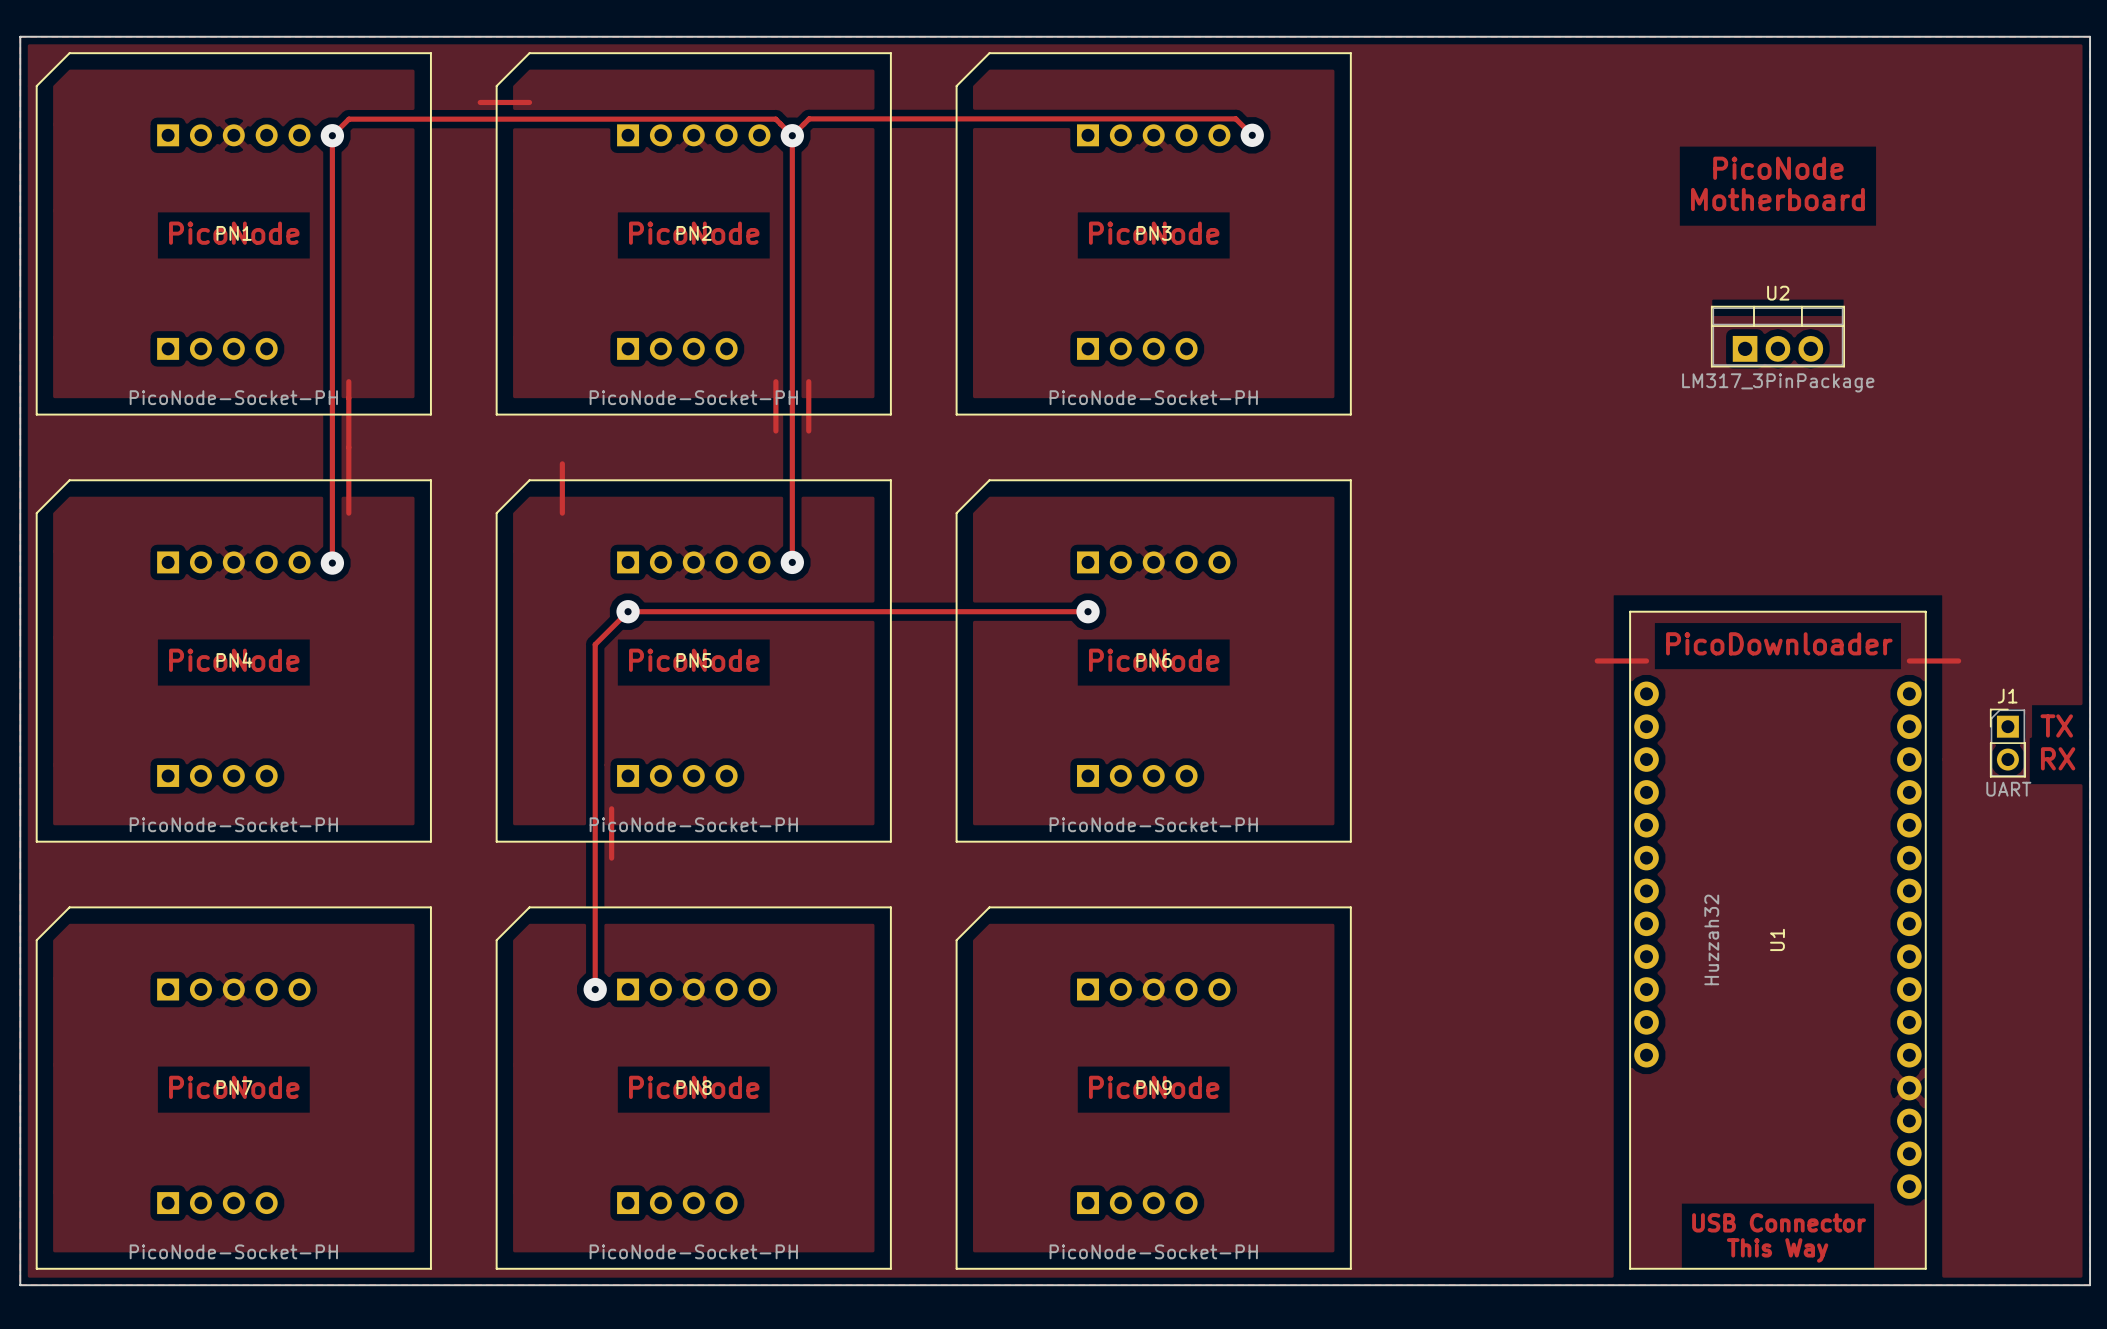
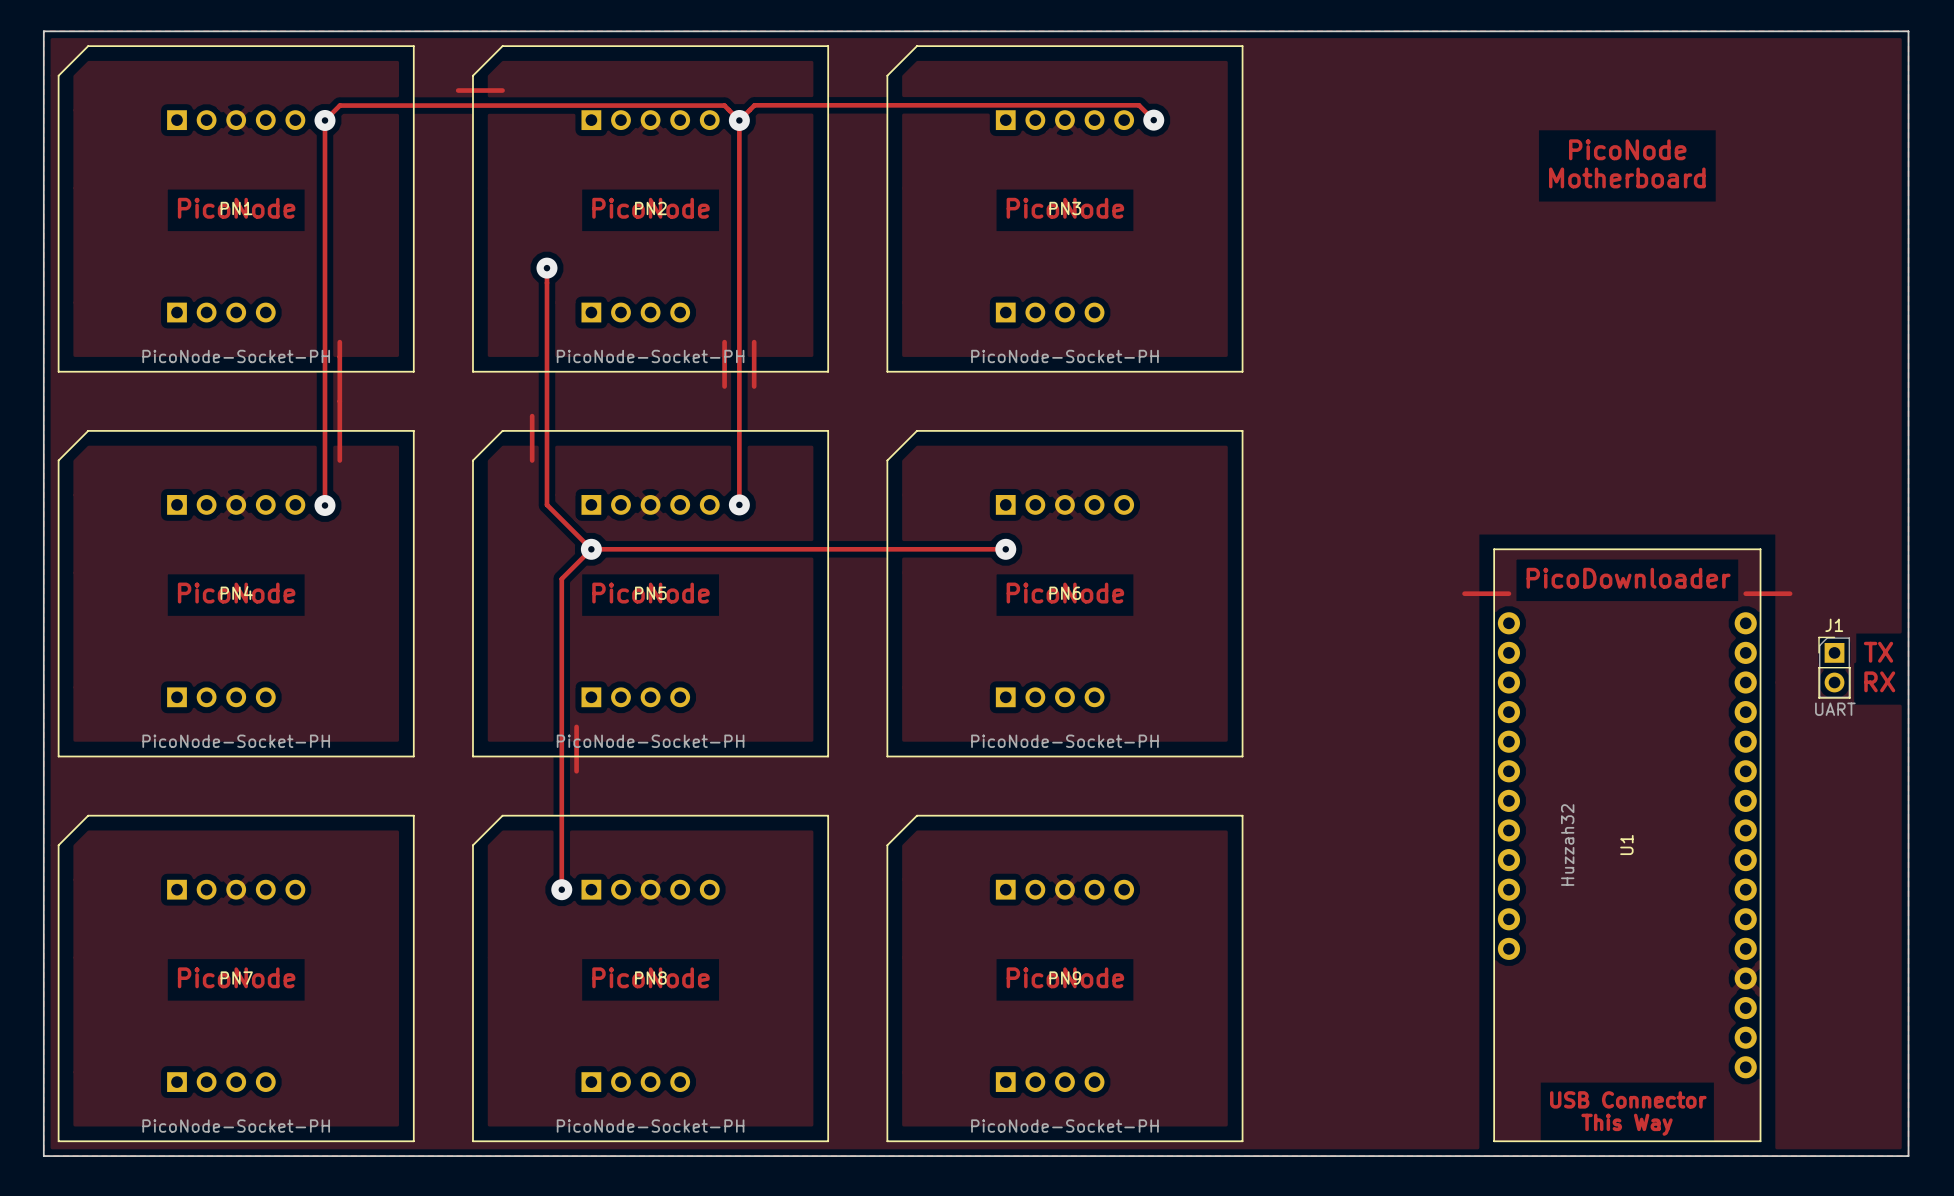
track: none -> (546, 268) (546, 504) (591, 549)
via: none -> (546, 268)
U2: LM317_3PinPackage (1777, 336) -> none

